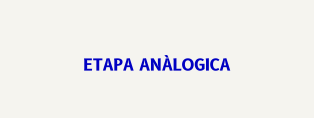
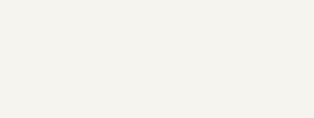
text: ETAPA ANÀLOGICA (157, 62) -> none

